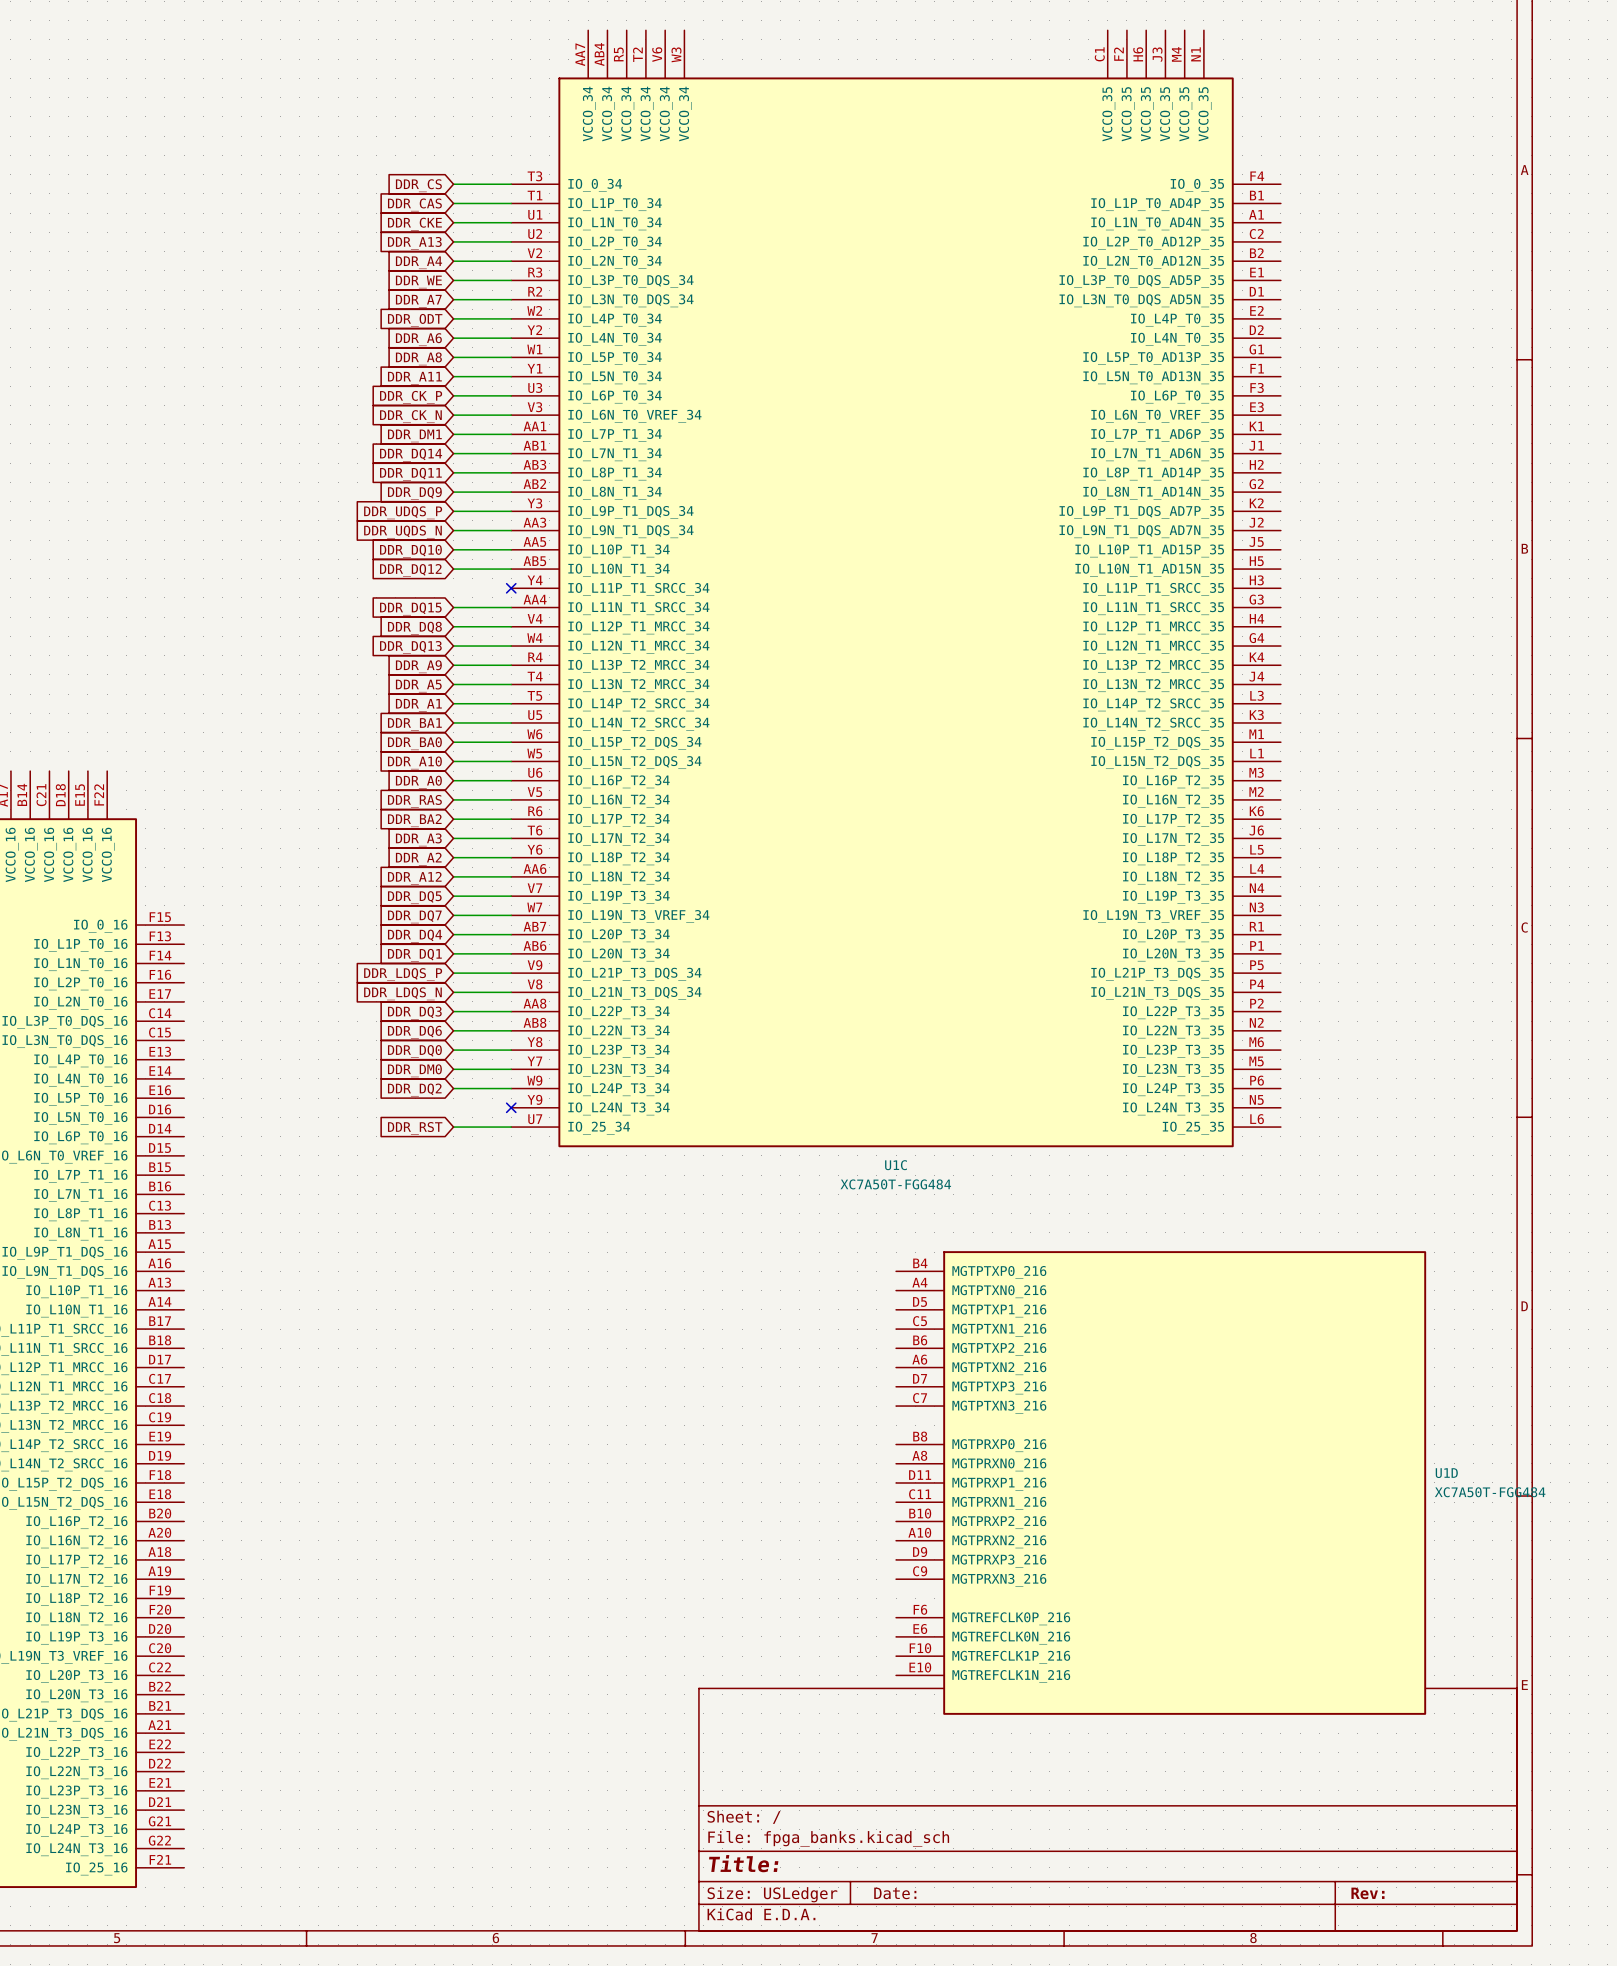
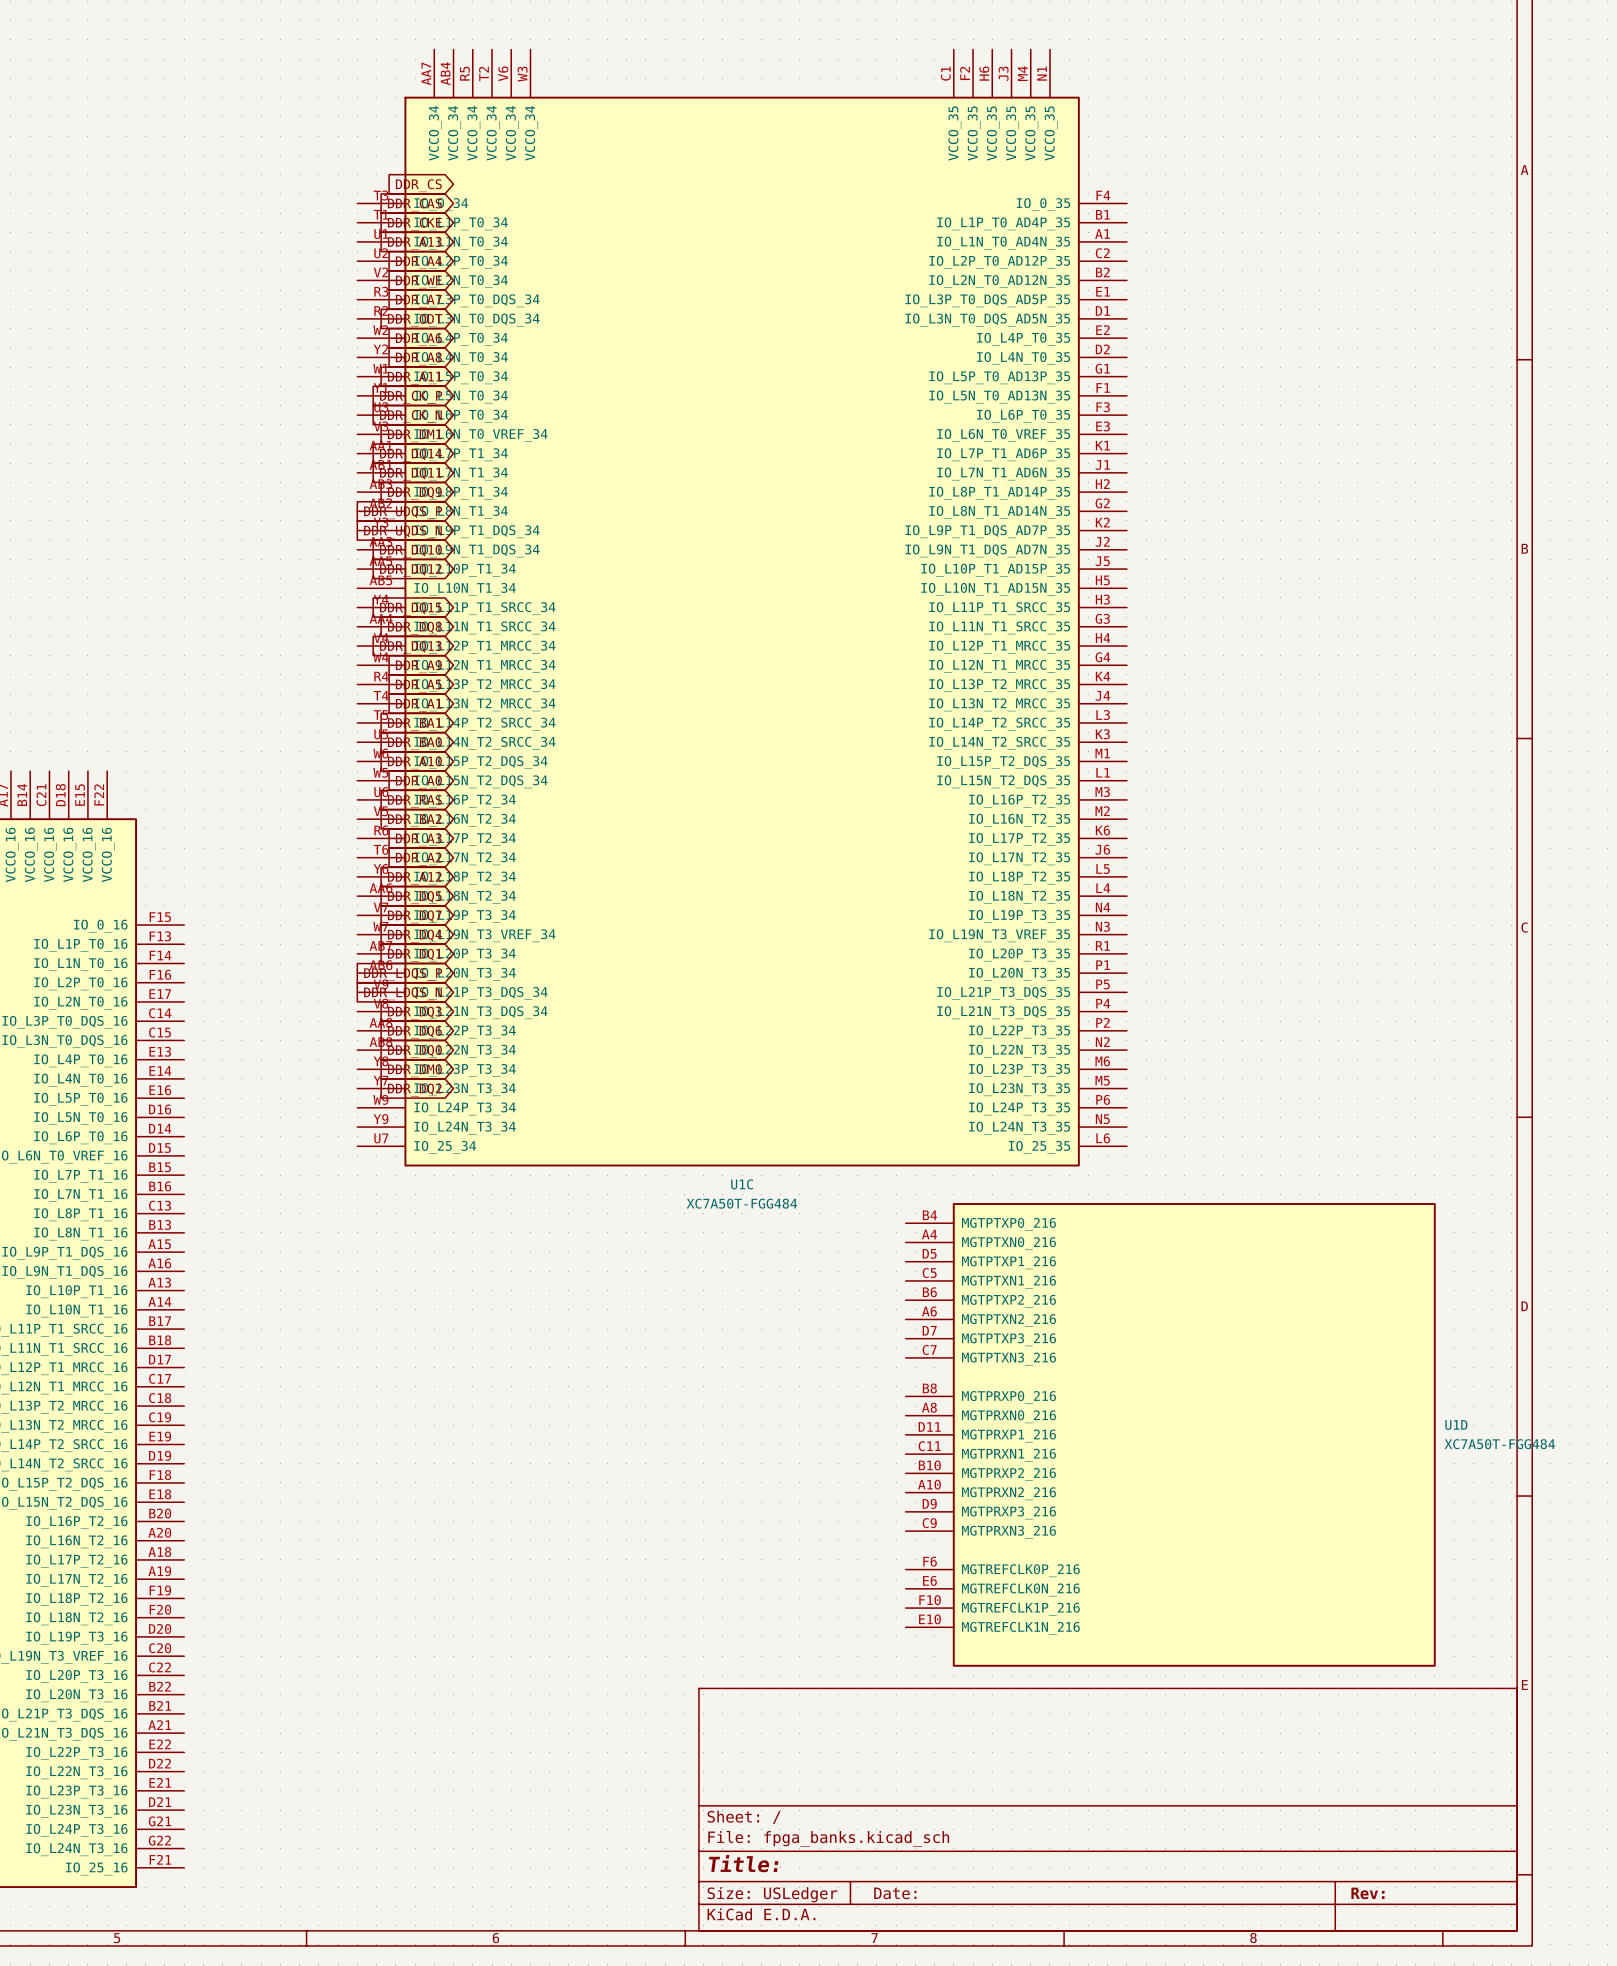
no-connect mark: (511, 588) -> none
U1C position: (896, 588) -> (742, 608)
no-connect mark: (511, 1107) -> none
global label: DDR_RST (415, 1128) -> none
U1D position: (1161, 1482) -> (1170, 1434)

